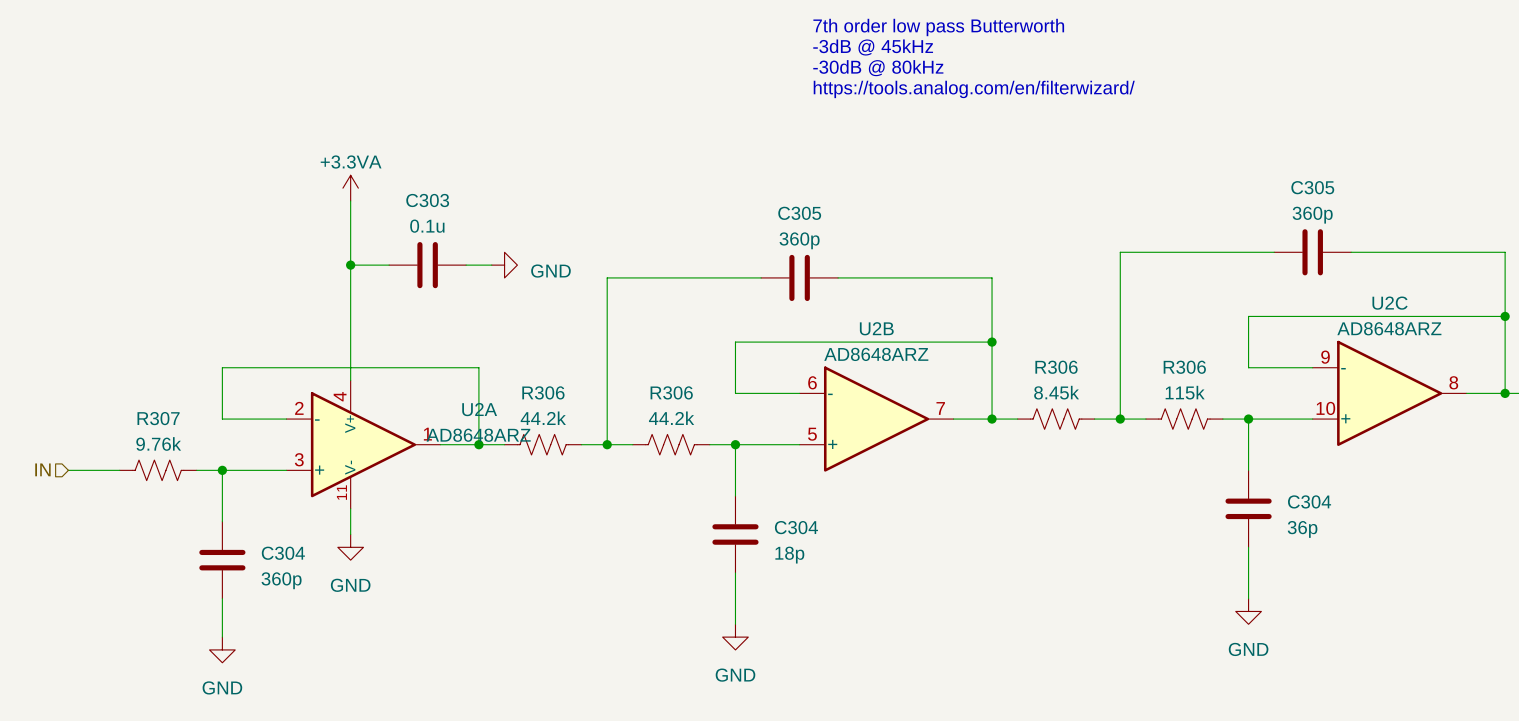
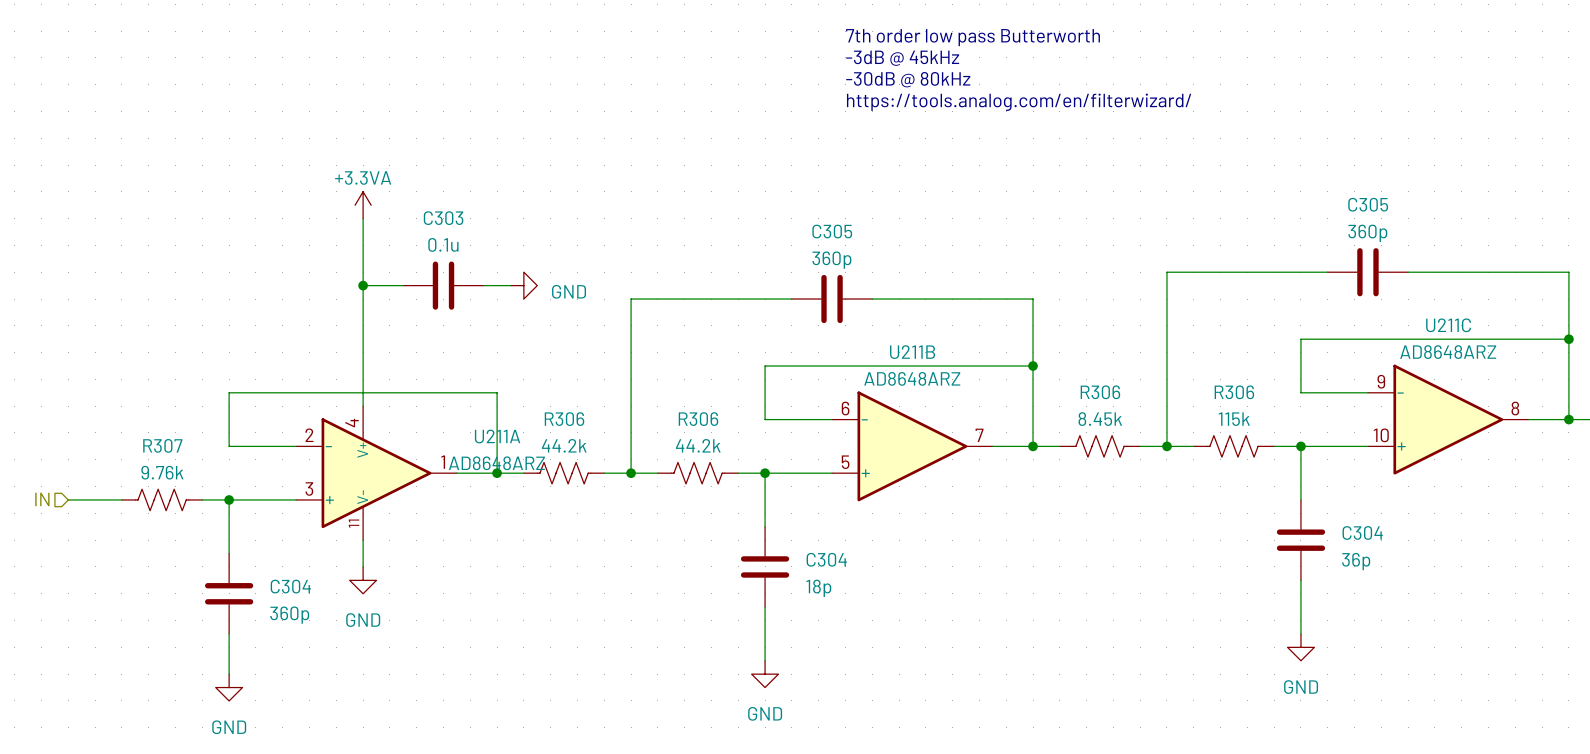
U2C name: U2C (1390, 303) -> U211C (1448, 325)
U2B name: U2B (876, 328) -> U211B (912, 352)
U2A name: U2A (479, 409) -> U211A (497, 436)

